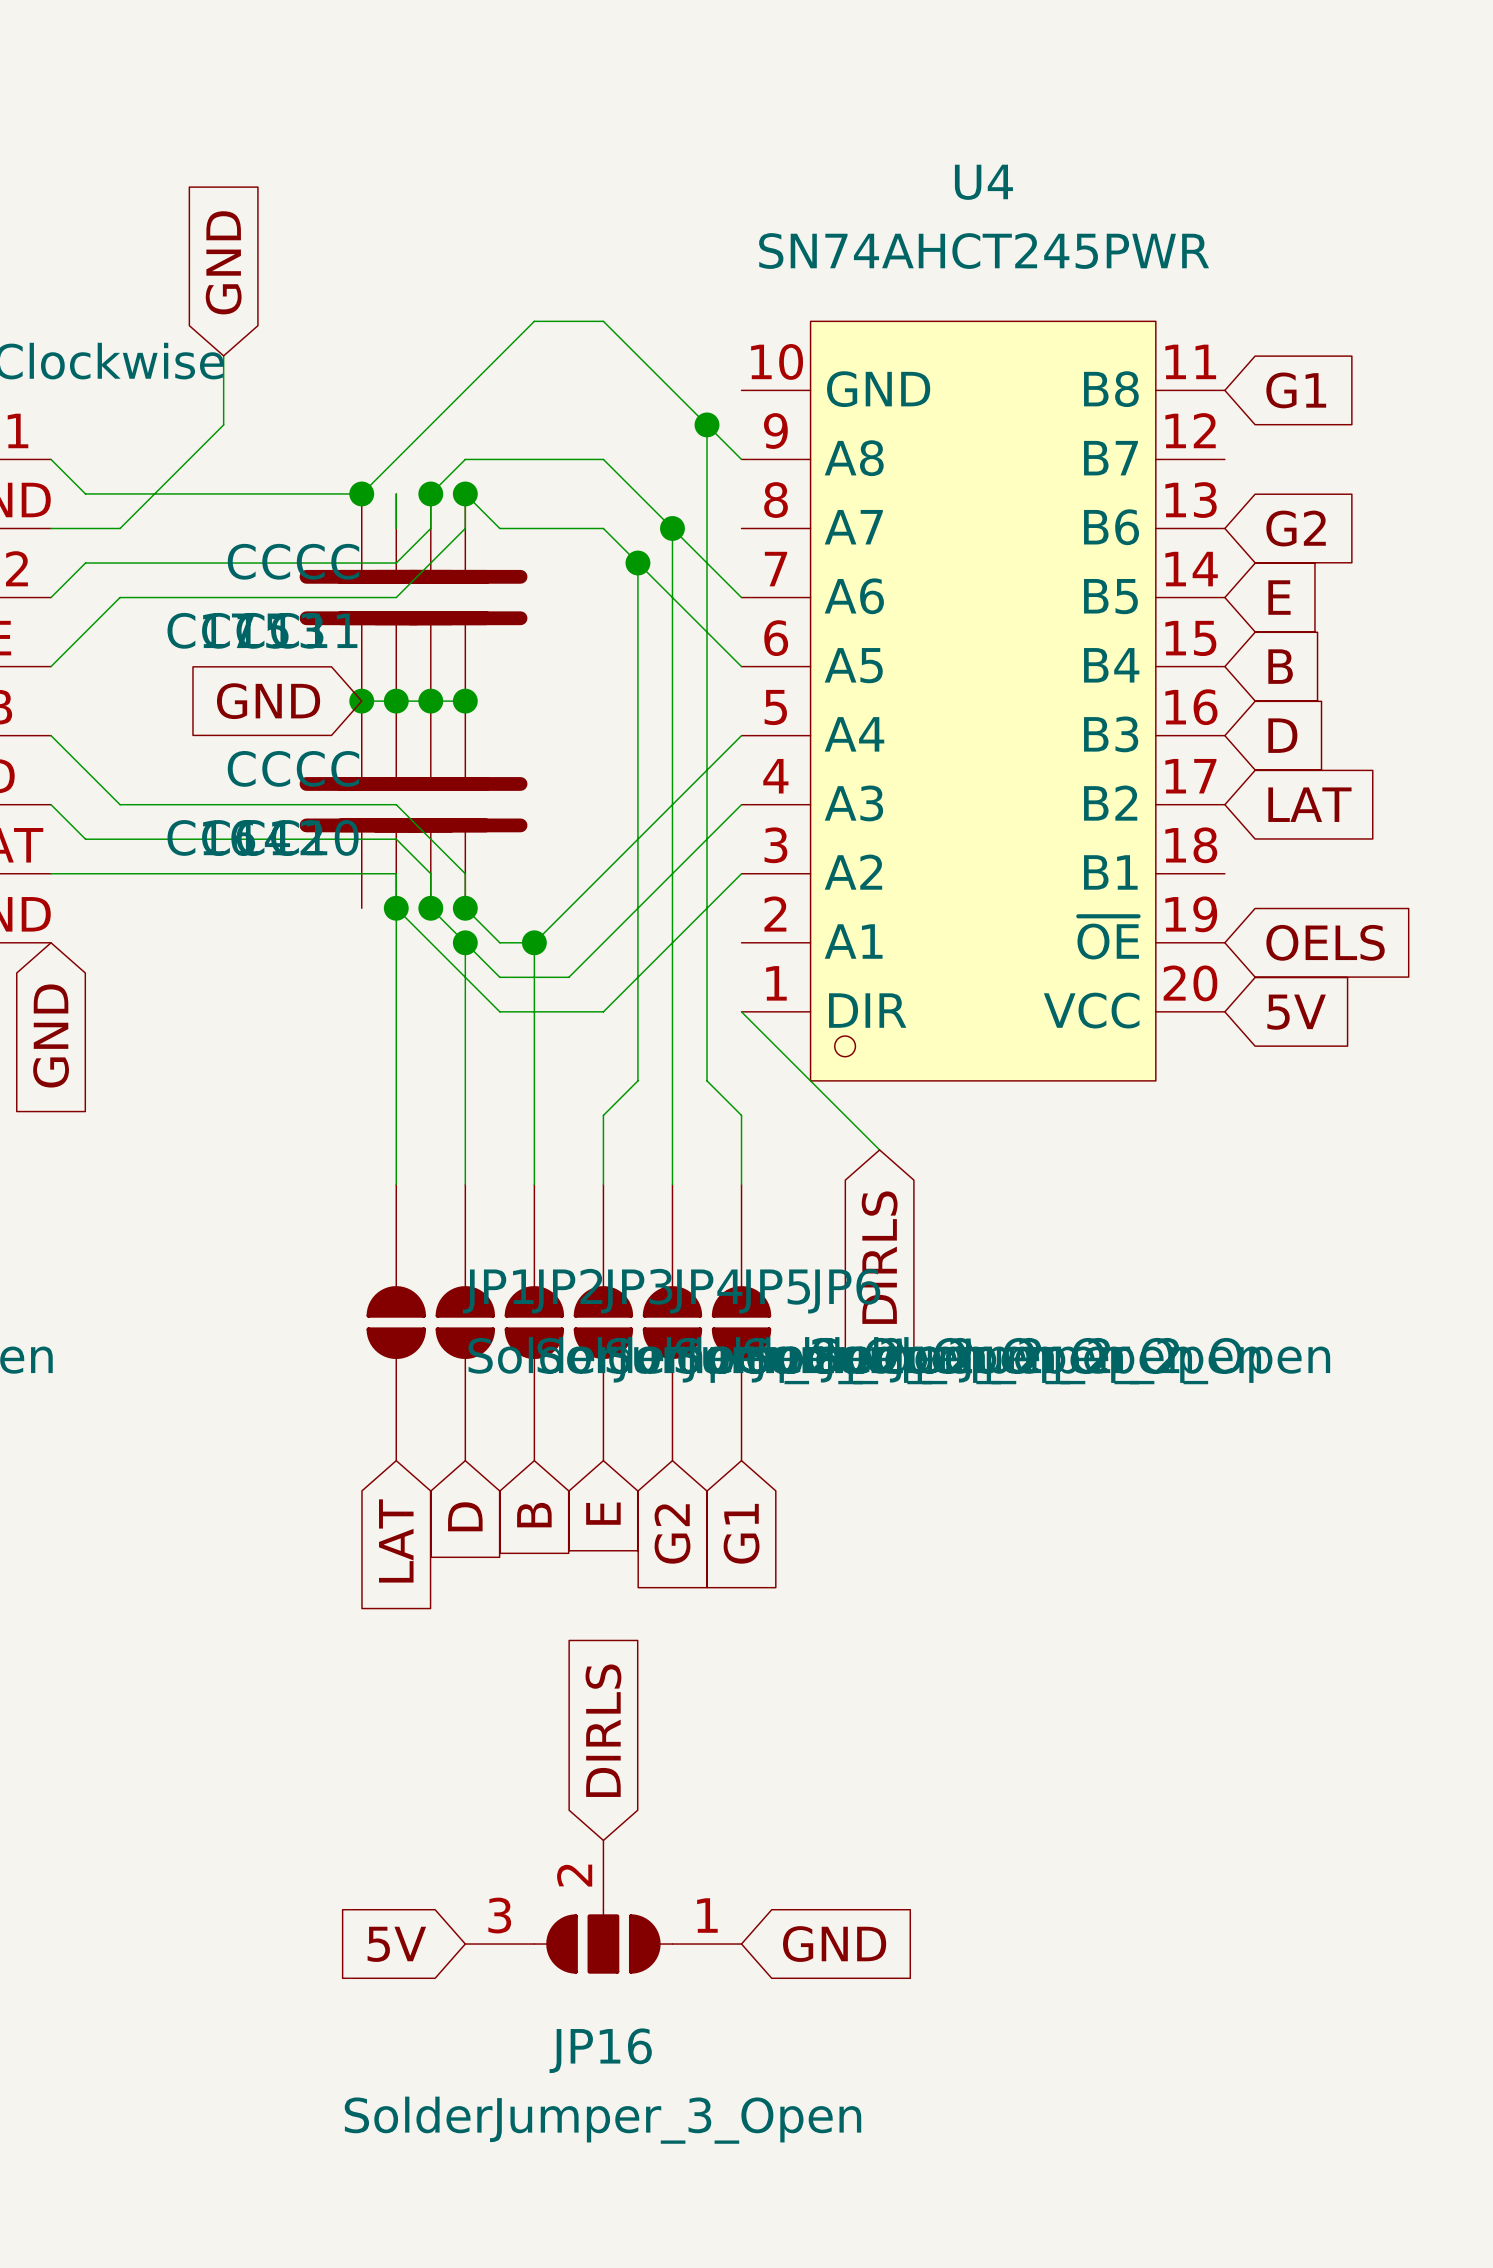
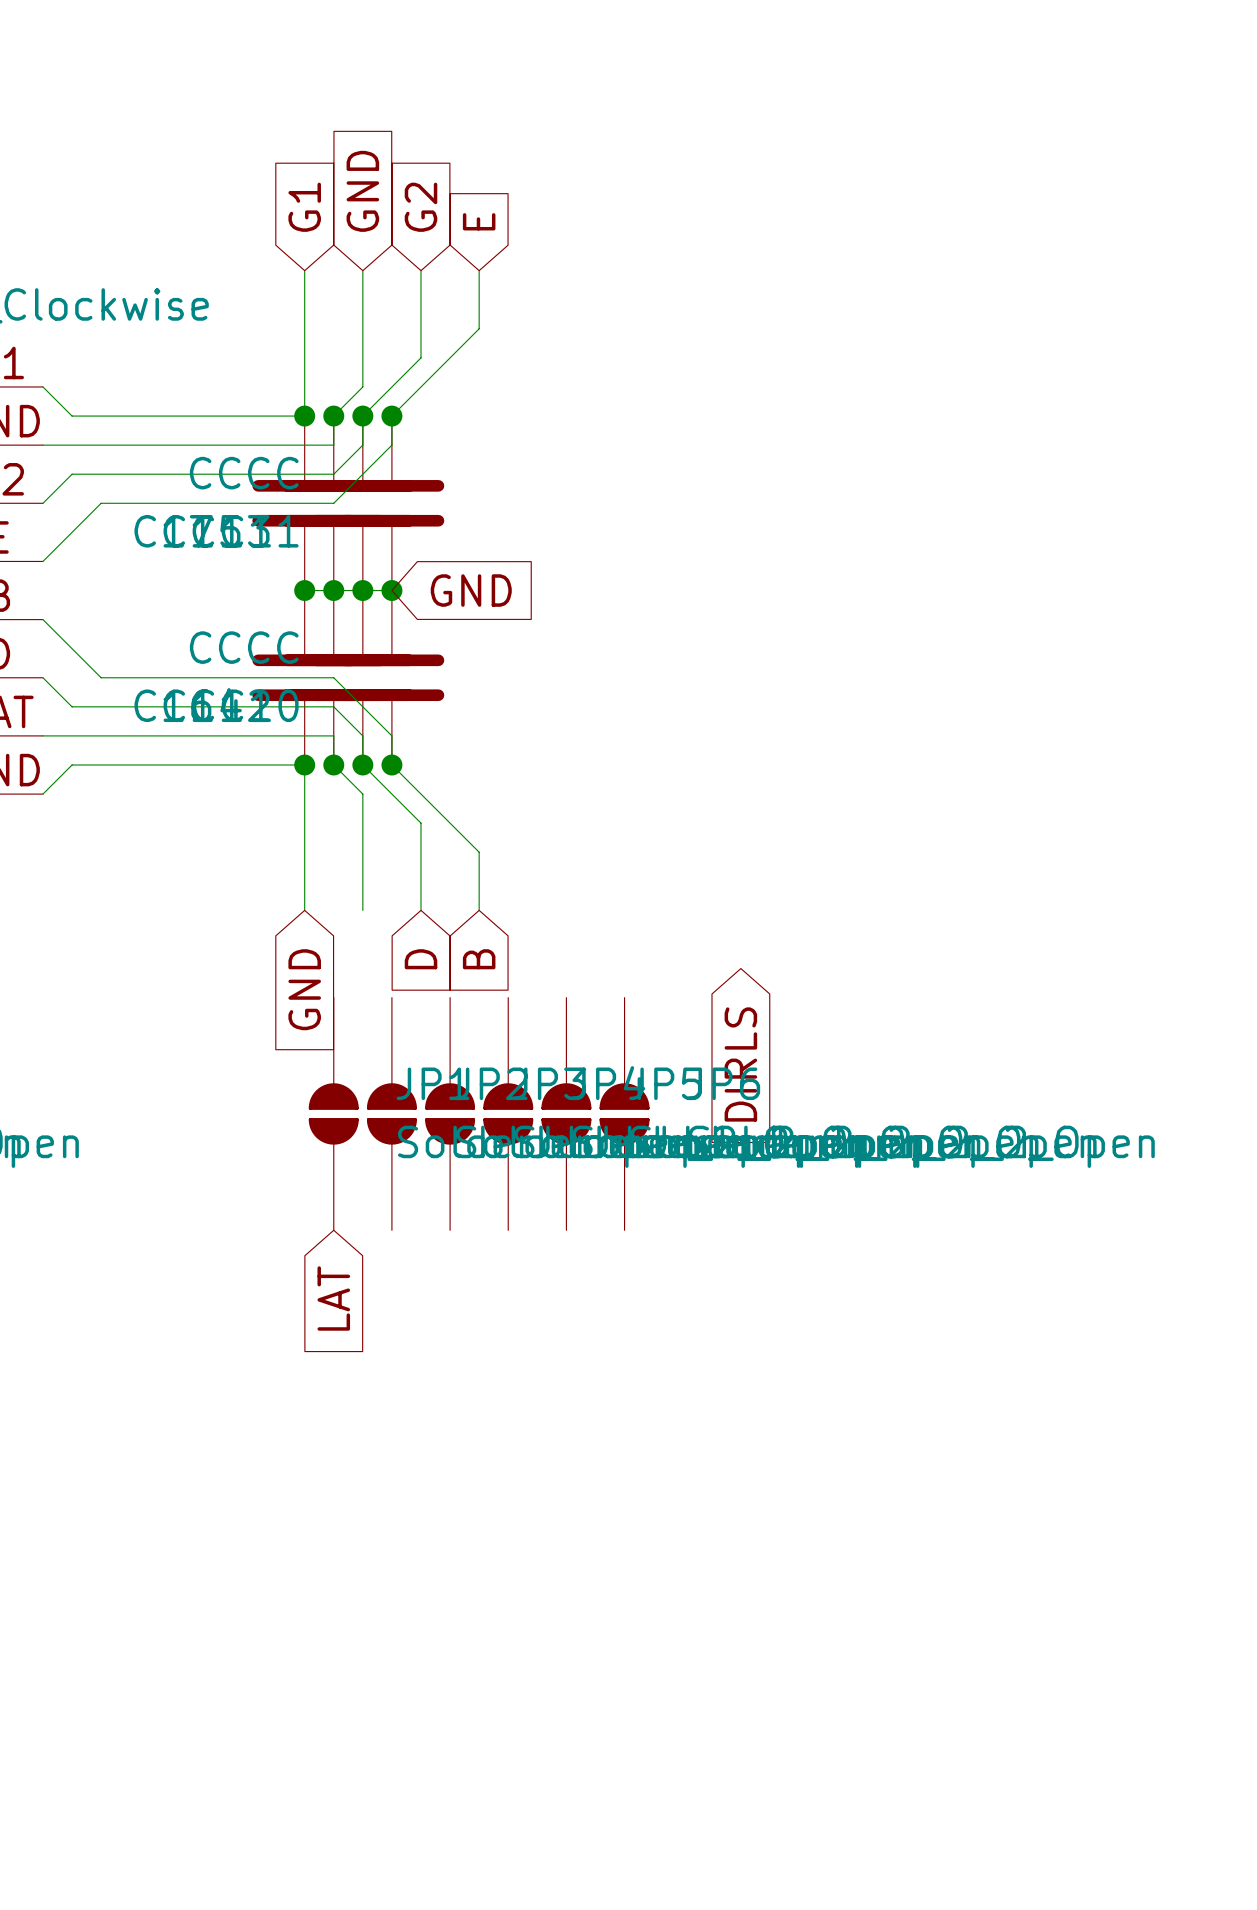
global label: none -> GND (362, 191)
global label: none -> G1 (304, 207)
global label: none -> G2 (421, 207)
global label: GND (223, 262) -> none
global label: none -> E (479, 221)
wire: none -> (362, 270) (362, 386) (333, 416)
wire: (223, 355) (223, 424) (120, 528) -> (333, 445) (101, 445)
global label: G1 (1296, 390) -> none
wire: (706, 424) (706, 1080) (741, 1115) (741, 1184) -> none
junction: (706, 424) -> none
wire: (465, 459) (603, 459) (741, 597) -> (391, 386) (421, 357) (421, 270)
wire: (741, 459) (603, 321) (534, 321) (361, 493) -> (304, 270) (304, 416)
junction: none -> (333, 416)
wire: (465, 493) (499, 528) (603, 528) (741, 666) -> (391, 416) (479, 328) (479, 270)
wire: (672, 528) (672, 1184) -> none
junction: (672, 528) -> none
global label: G2 (1296, 528) -> none
wire: (637, 563) (637, 1080) (603, 1115) (603, 1184) -> none
junction: (637, 563) -> none
global label: E (1279, 597) -> none
global label: B (1280, 666) -> none
global label rotation: 0° (268, 701) -> 180° (471, 590)
global label position: GND (268, 701) -> GND (471, 590)
U4: SN74AHCT245PWR (983, 701) -> none
wire: (741, 735) (534, 942) -> none
global label: D (1282, 735) -> none
wire: (741, 804) (568, 977) (499, 977) -> (421, 910) (421, 823)
global label: LAT (1309, 804) -> none
wire: (741, 873) (603, 1011) (499, 1011) (430, 942) -> (362, 910) (362, 794)
junction: none -> (304, 765)
wire: (396, 908) (396, 1184) -> none
wire: none -> (42, 794) (72, 765) (304, 765) (304, 910)
wire: (465, 942) (465, 1184) -> none
junction: (465, 942) -> none
wire: (499, 942) (534, 942) -> (421, 794) (479, 852) (479, 910)
wire: (534, 942) (534, 1184) -> none
junction: (534, 942) -> none
global label: OELS (1325, 942) -> none
wire: (741, 1011) (879, 1149) -> none
global label: 5V (1296, 1012) -> none
global label: GND (51, 1035) -> none
global label: none -> GND (304, 989)
global label: E (603, 1513) -> none
global label position: B (534, 1515) -> B (479, 959)
global label position: D (465, 1516) -> D (421, 959)
global label: G2 (672, 1533) -> none
global label: G1 (741, 1533) -> none
global label: DIRLS (603, 1730) -> none
JP16: SolderJumper_3_Open (603, 1907) -> none
global label: 5V (396, 1944) -> none
global label: GND (834, 1944) -> none

